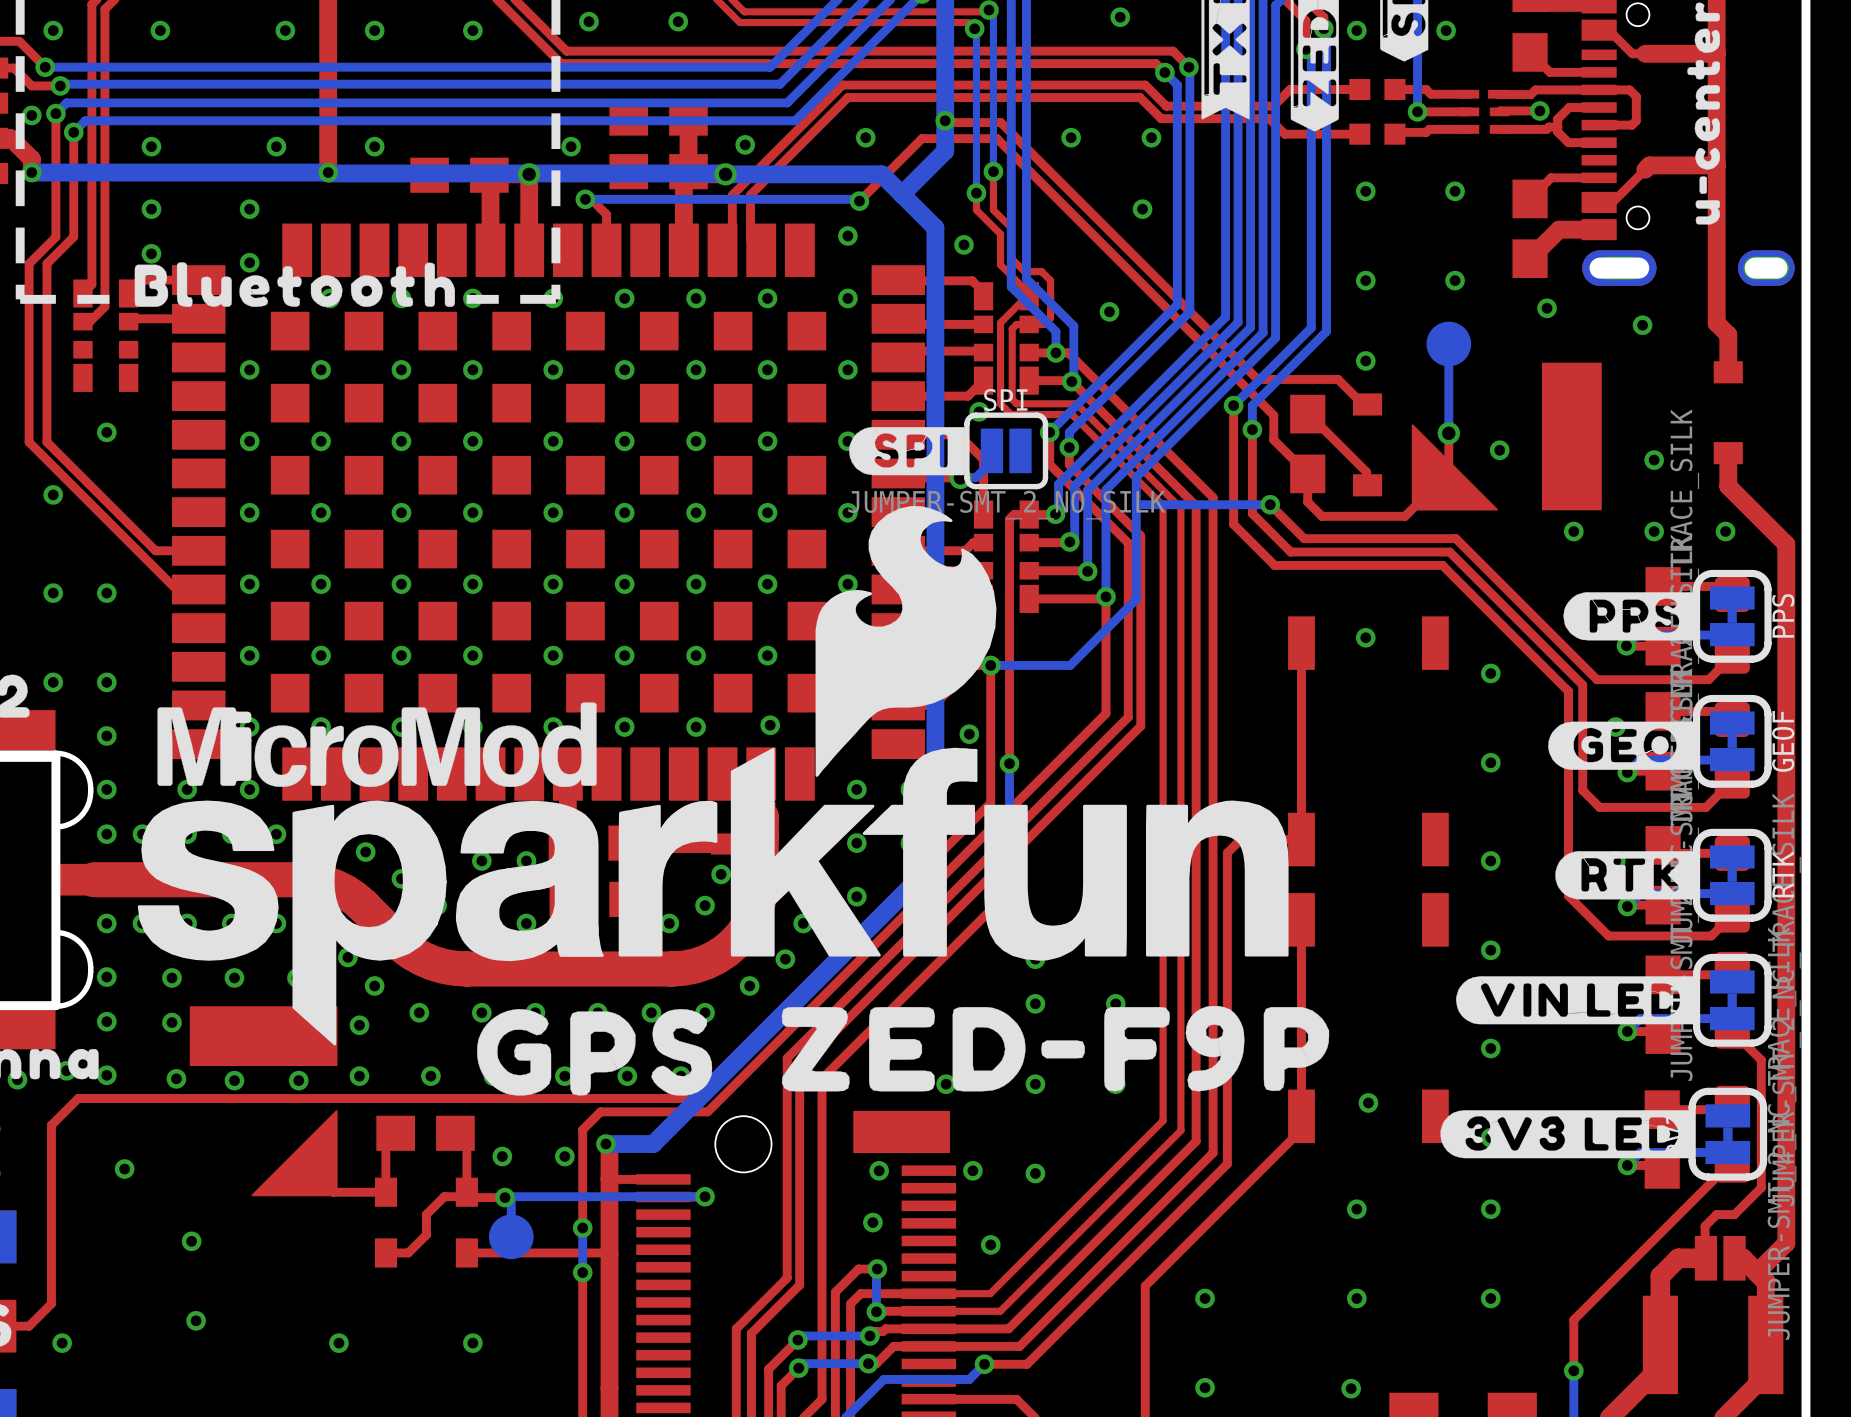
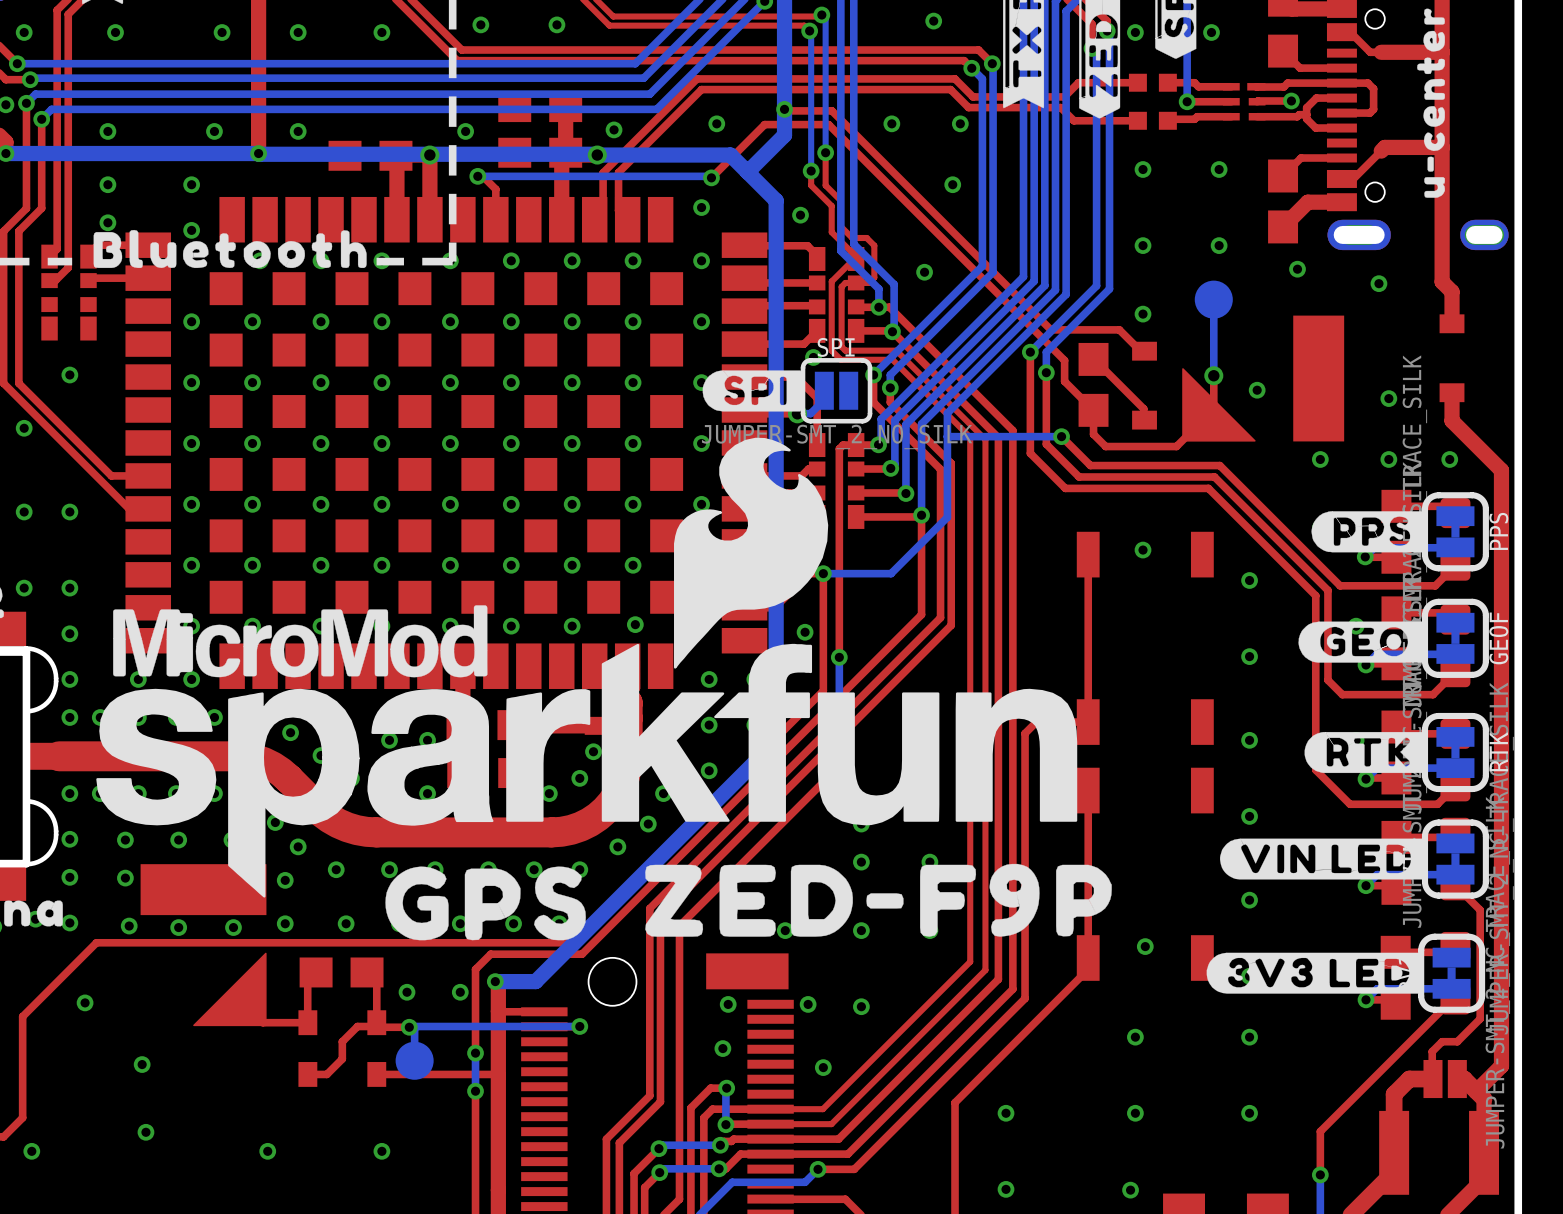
top track: (138, 1098) (78, 1098) (51, 1125) (51, 1185) -> (96, 942) (22, 1016)

